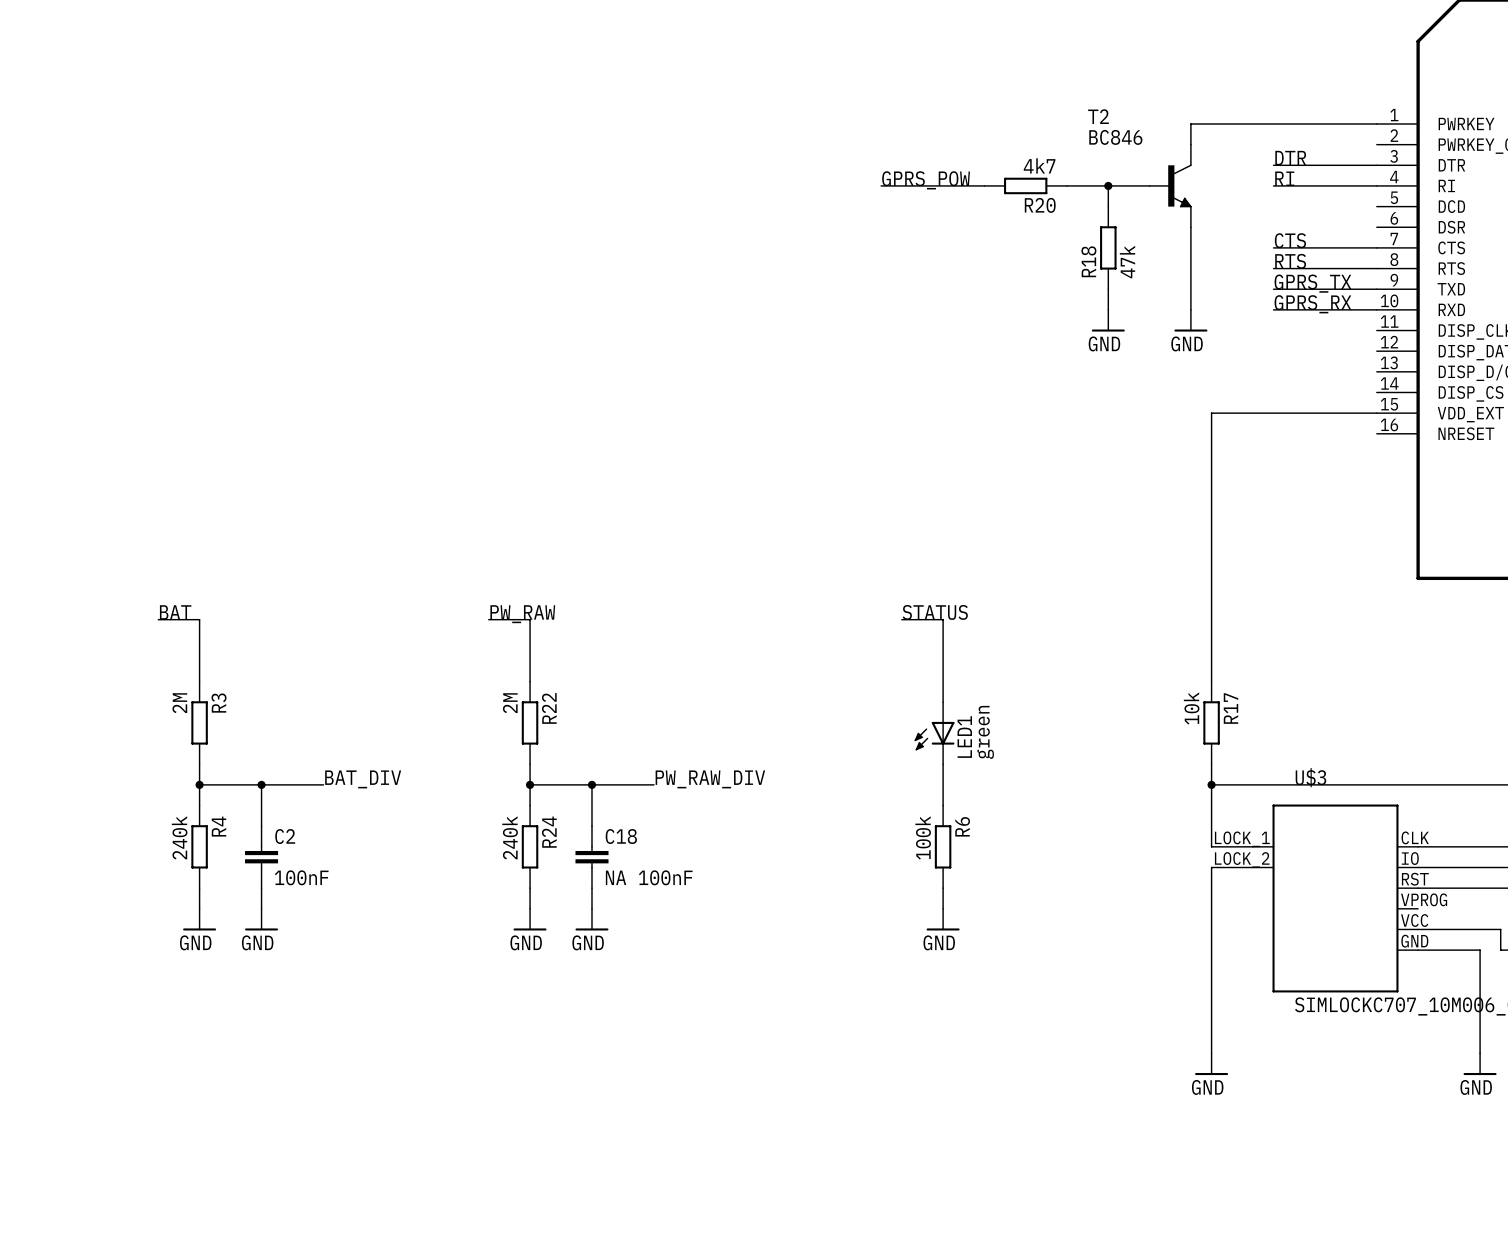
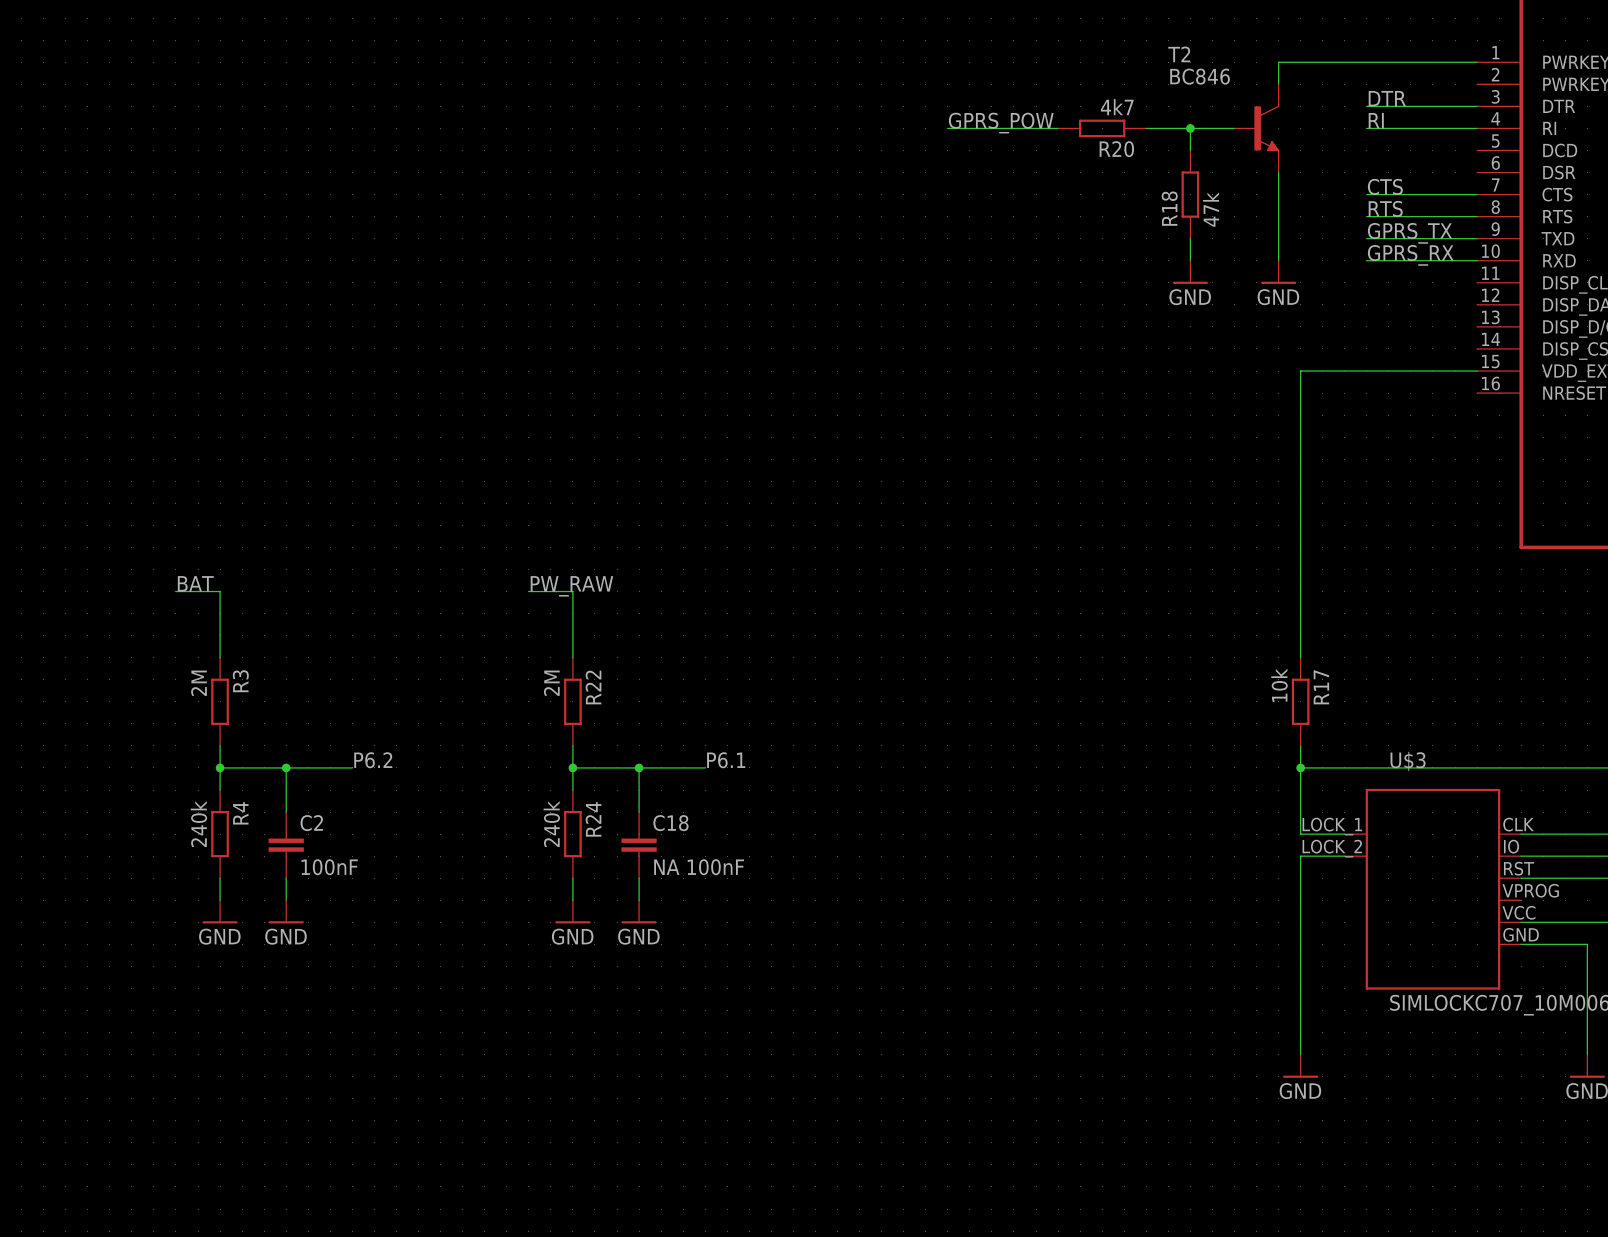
label: STATUS (935, 612) -> none
wire: (901, 619) (943, 619) (943, 702) -> none
LED1: green (934, 733) -> none
wire: (943, 764) (943, 805) -> none
label: BAT_DIV (363, 779) -> P6.2 (373, 760)
label: PW_RAW_DIV (710, 779) -> P6.1 (726, 760)
R6: 100k (943, 846) -> none
wire: (943, 888) (943, 908) -> none
power symbol: GND (943, 919) -> none

